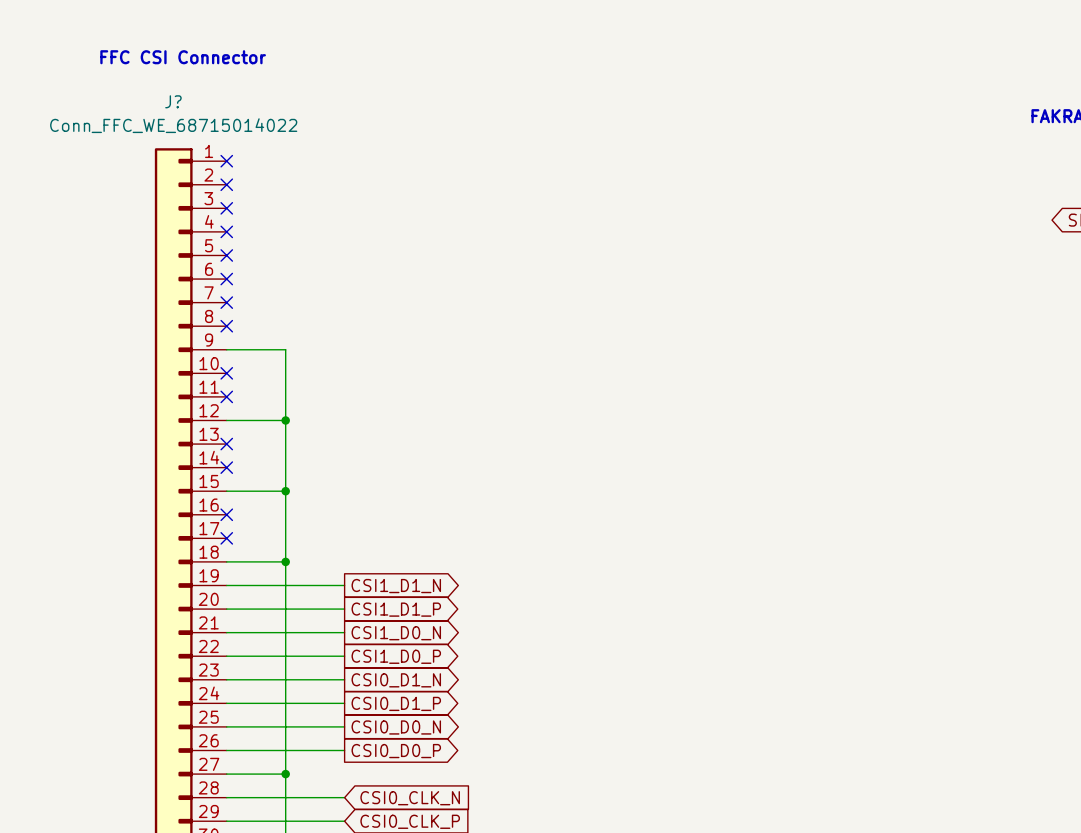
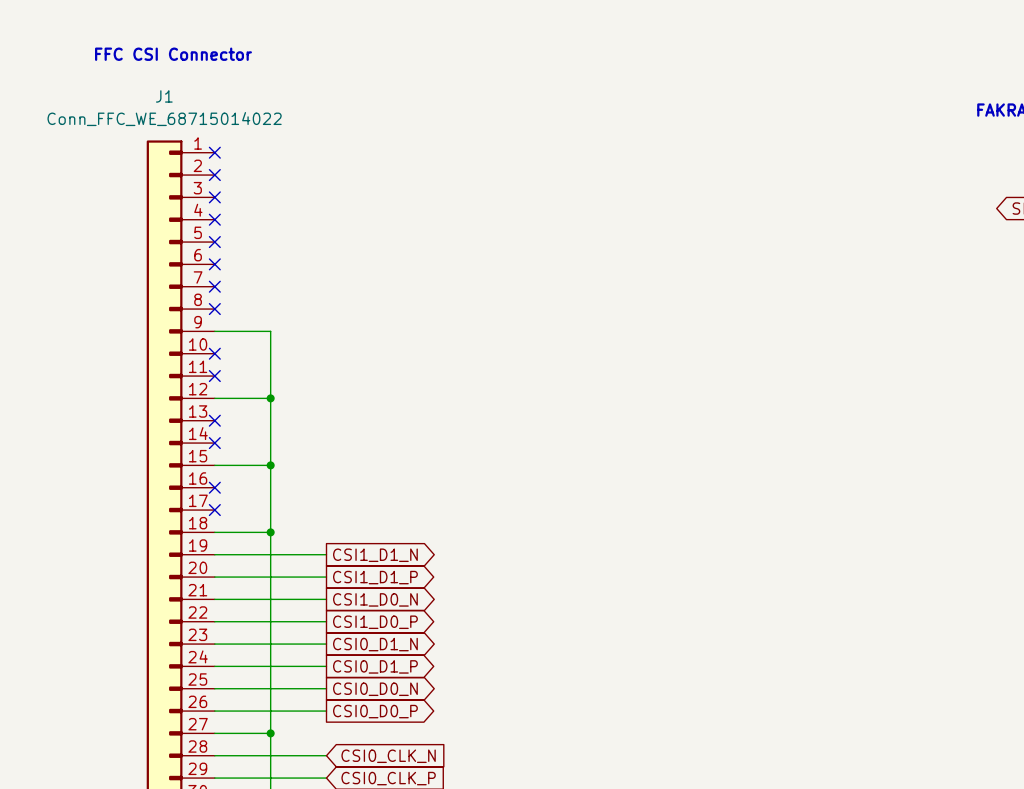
J? name: J? (173, 101) -> J1 (164, 96)

